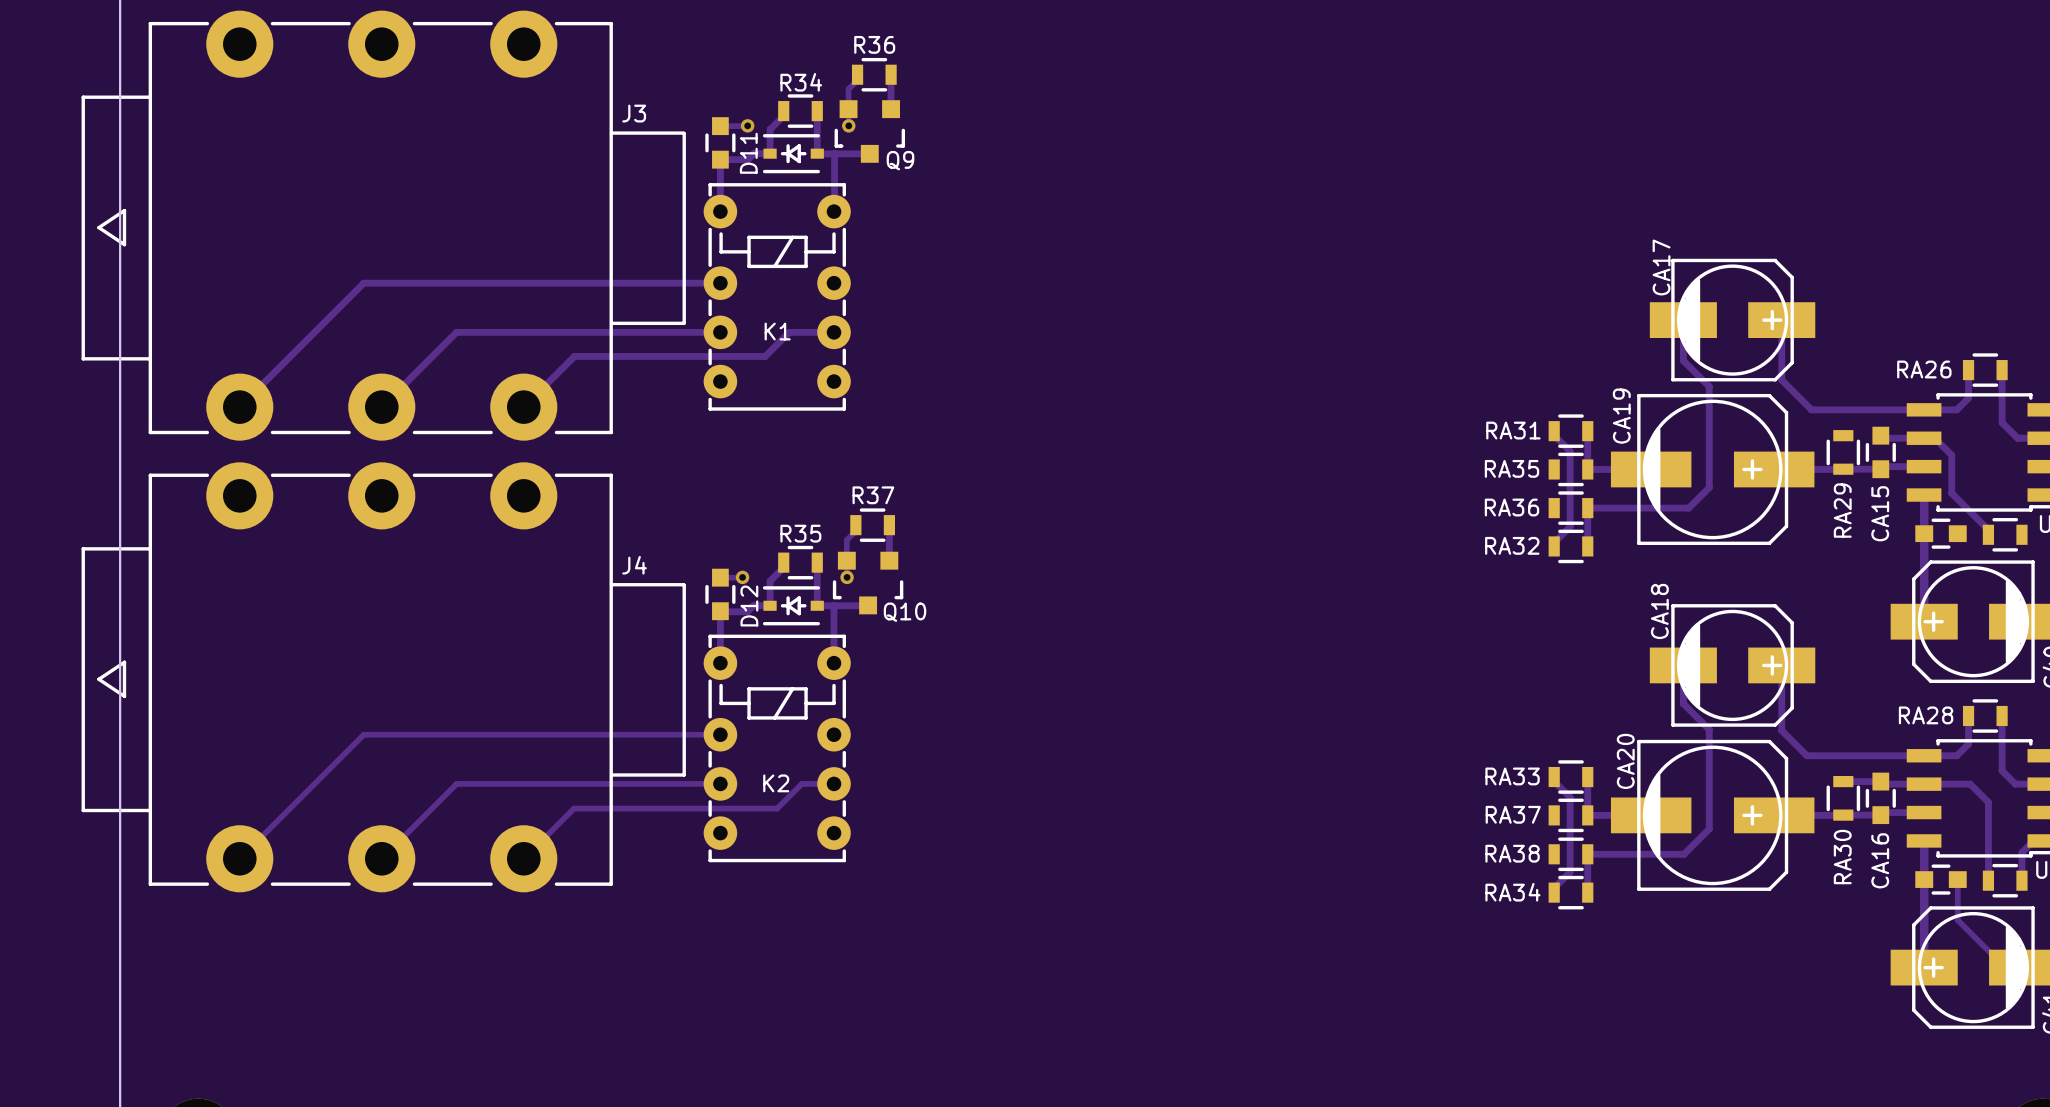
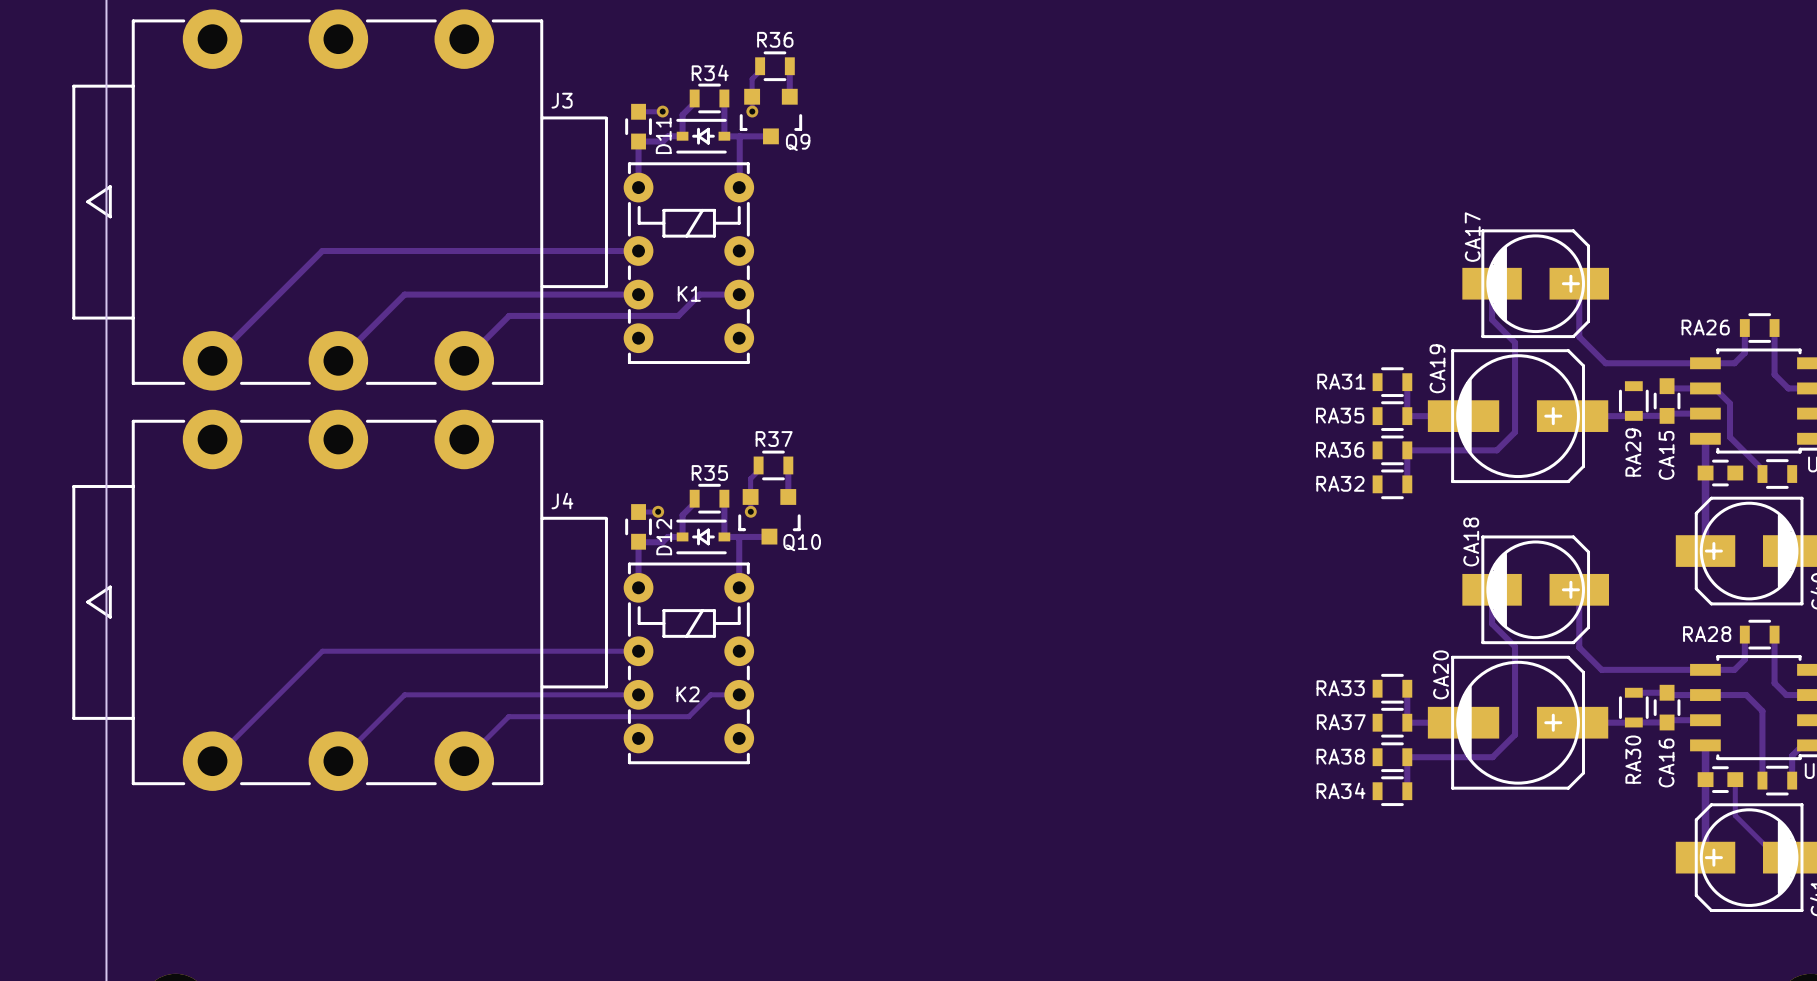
track: (1554, 431) (1554, 435) (1570, 451) (1570, 526) (1554, 542) (1554, 546) -> none
track: (1554, 777) (1554, 781) (1570, 797) (1570, 872) (1554, 888) (1554, 892) -> none

